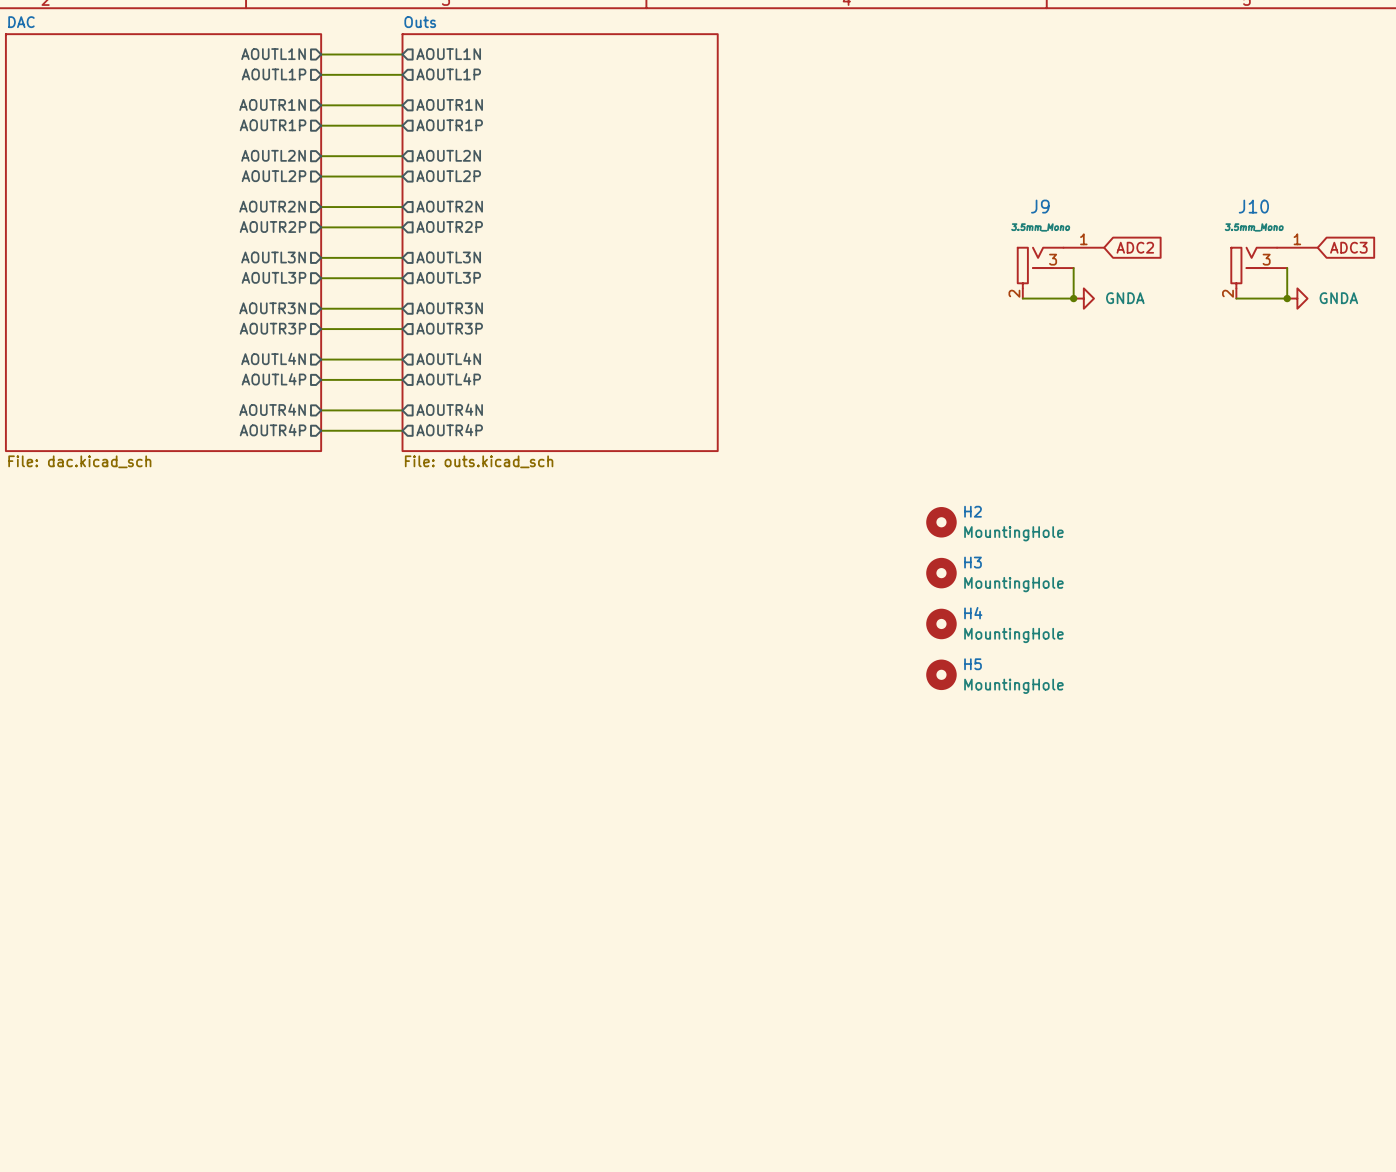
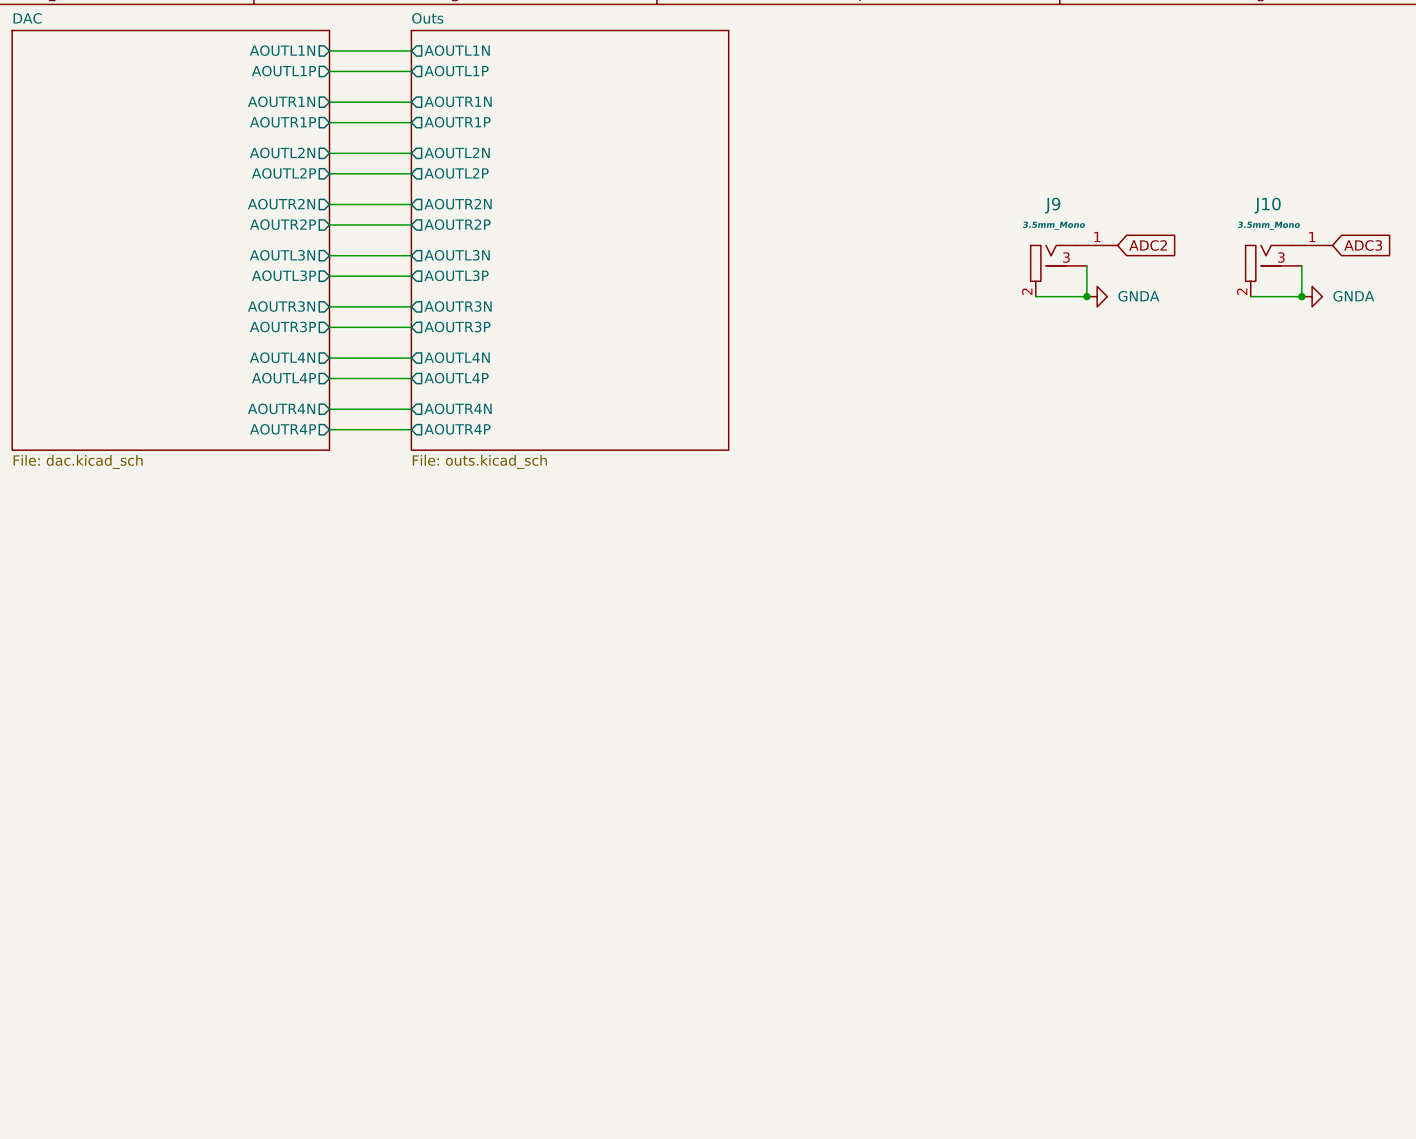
H2: MountingHole (941, 522) -> none
H3: MountingHole (941, 573) -> none
H4: MountingHole (941, 623) -> none
H5: MountingHole (941, 674) -> none

